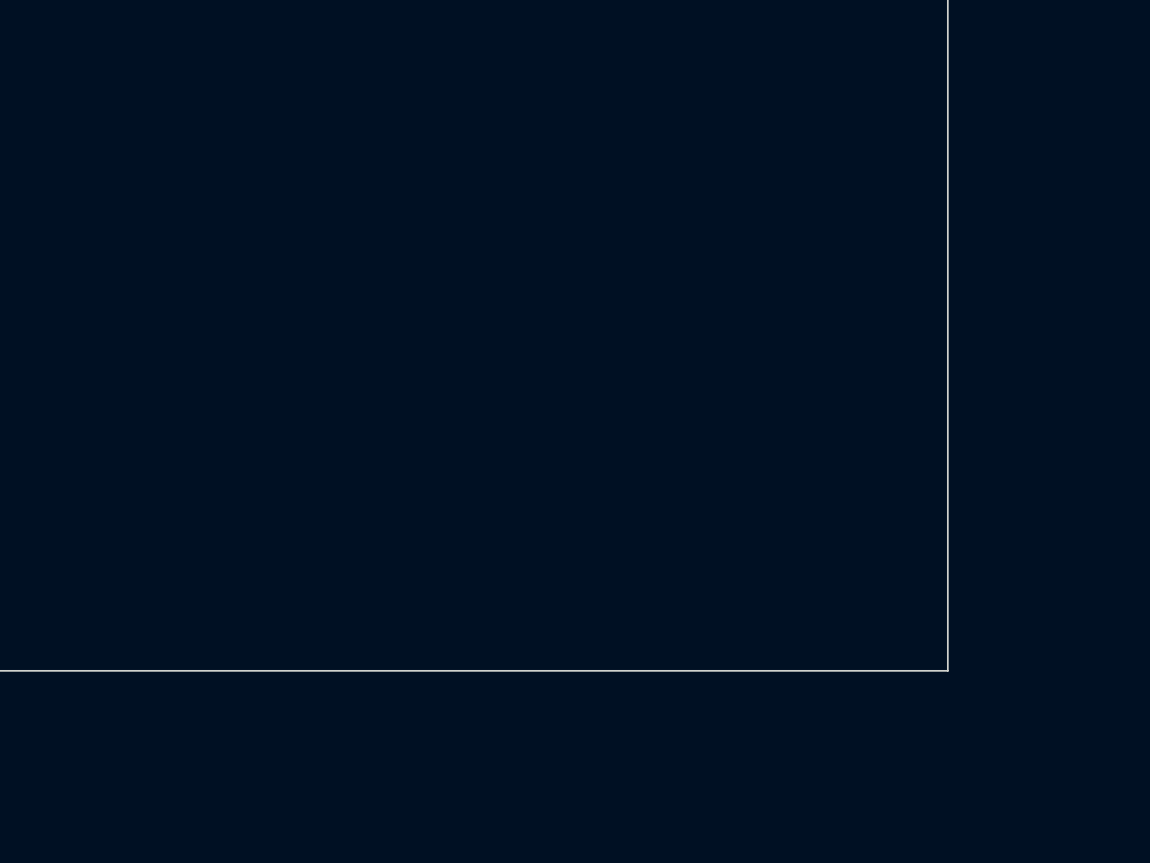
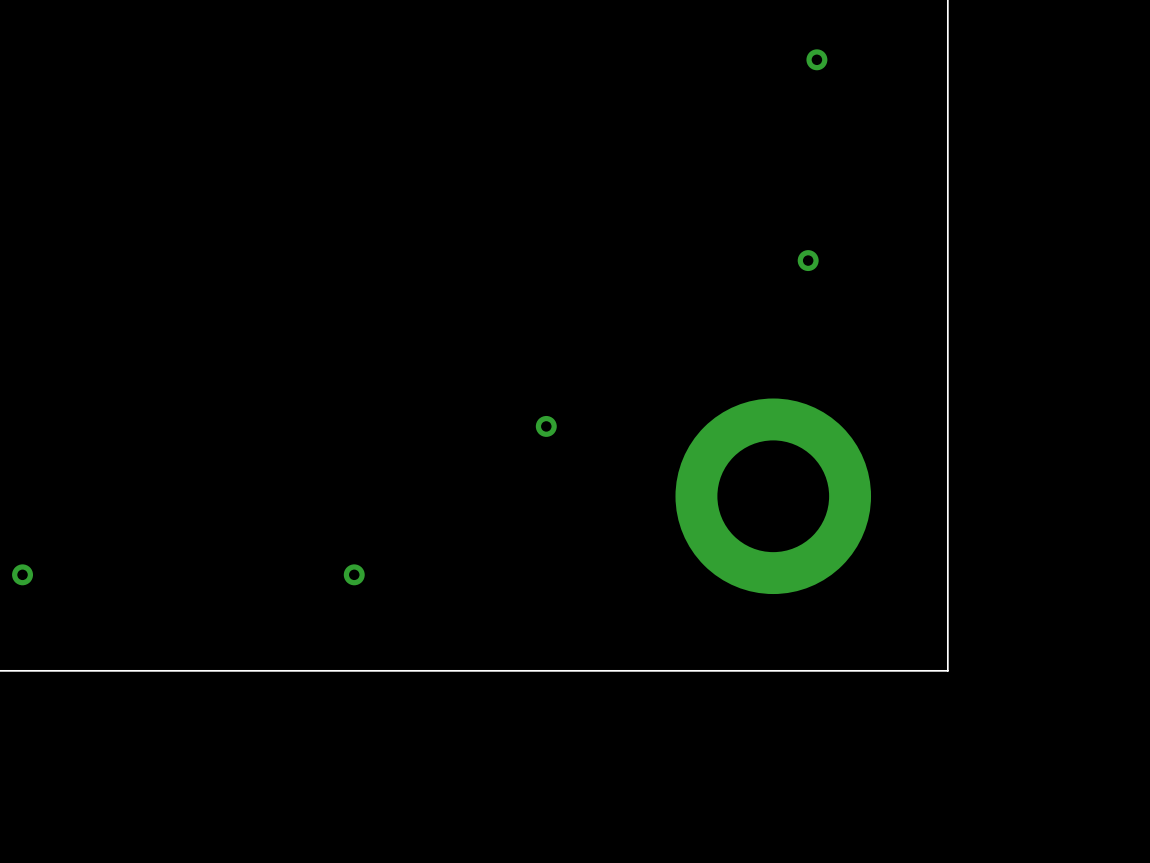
via: none -> (816, 59)
via: none -> (808, 260)
via: none -> (546, 426)
part: none -> (773, 496)
via: none -> (22, 574)
via: none -> (354, 574)

